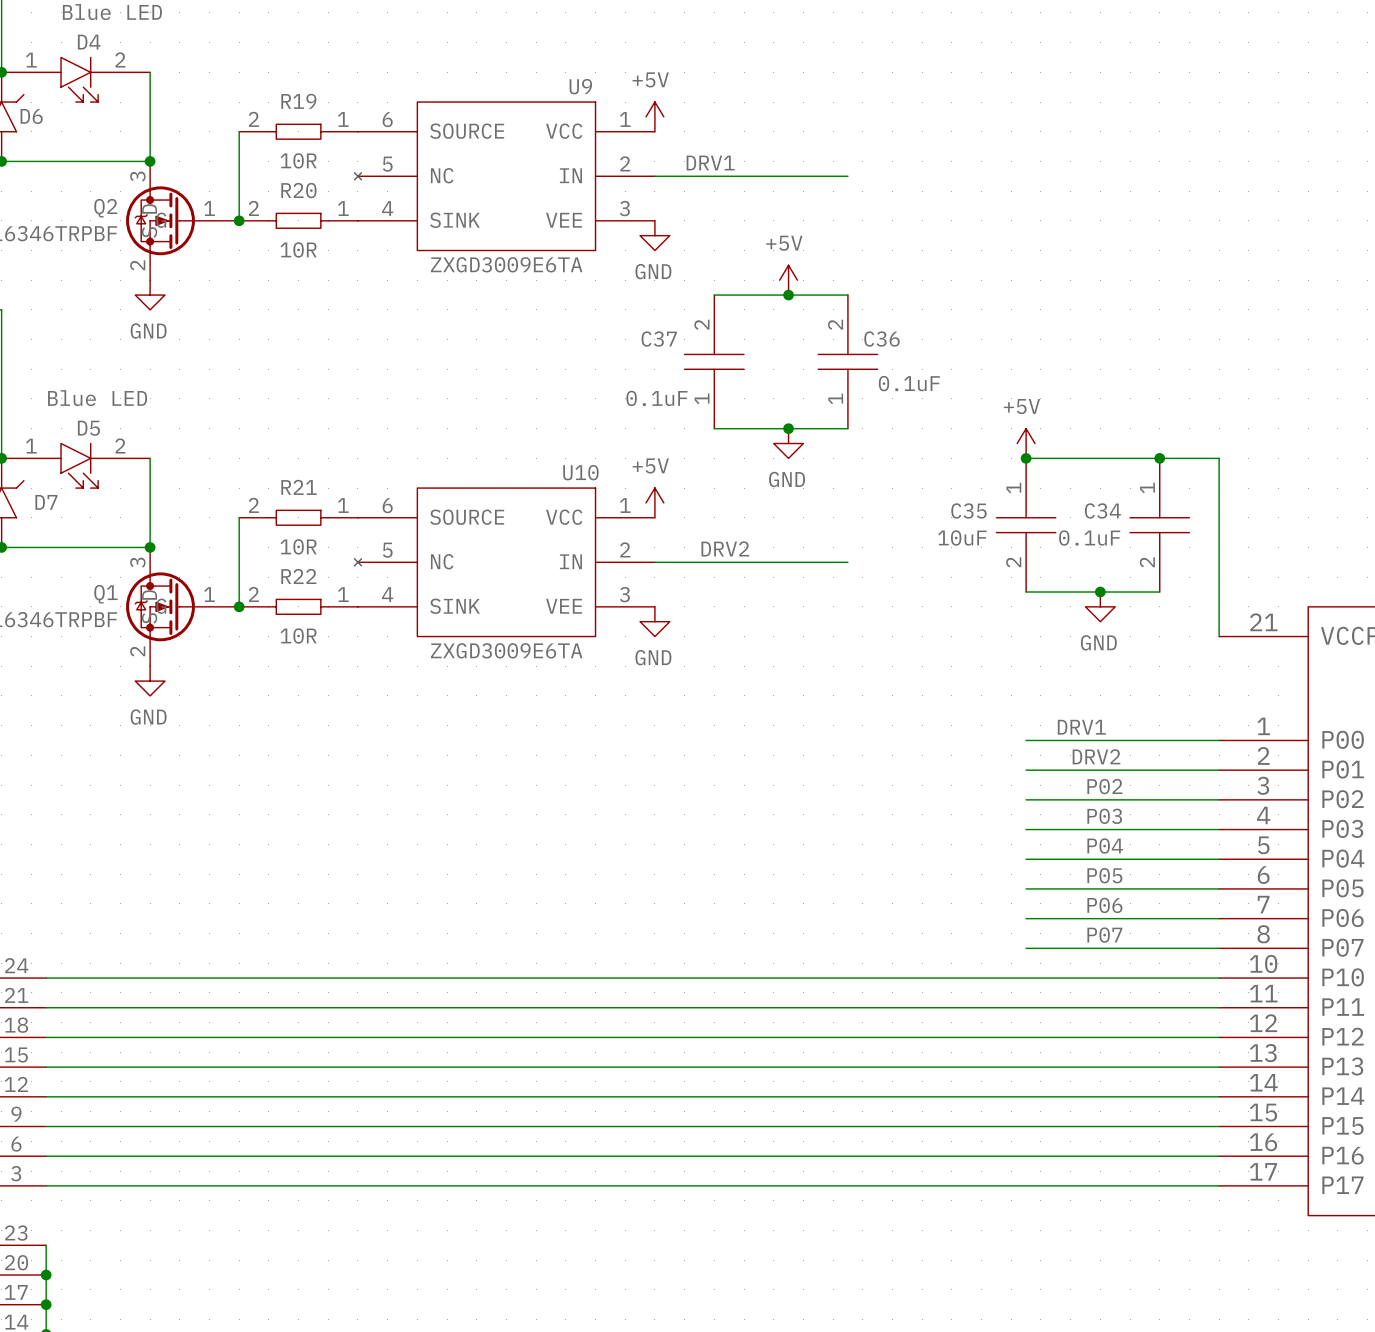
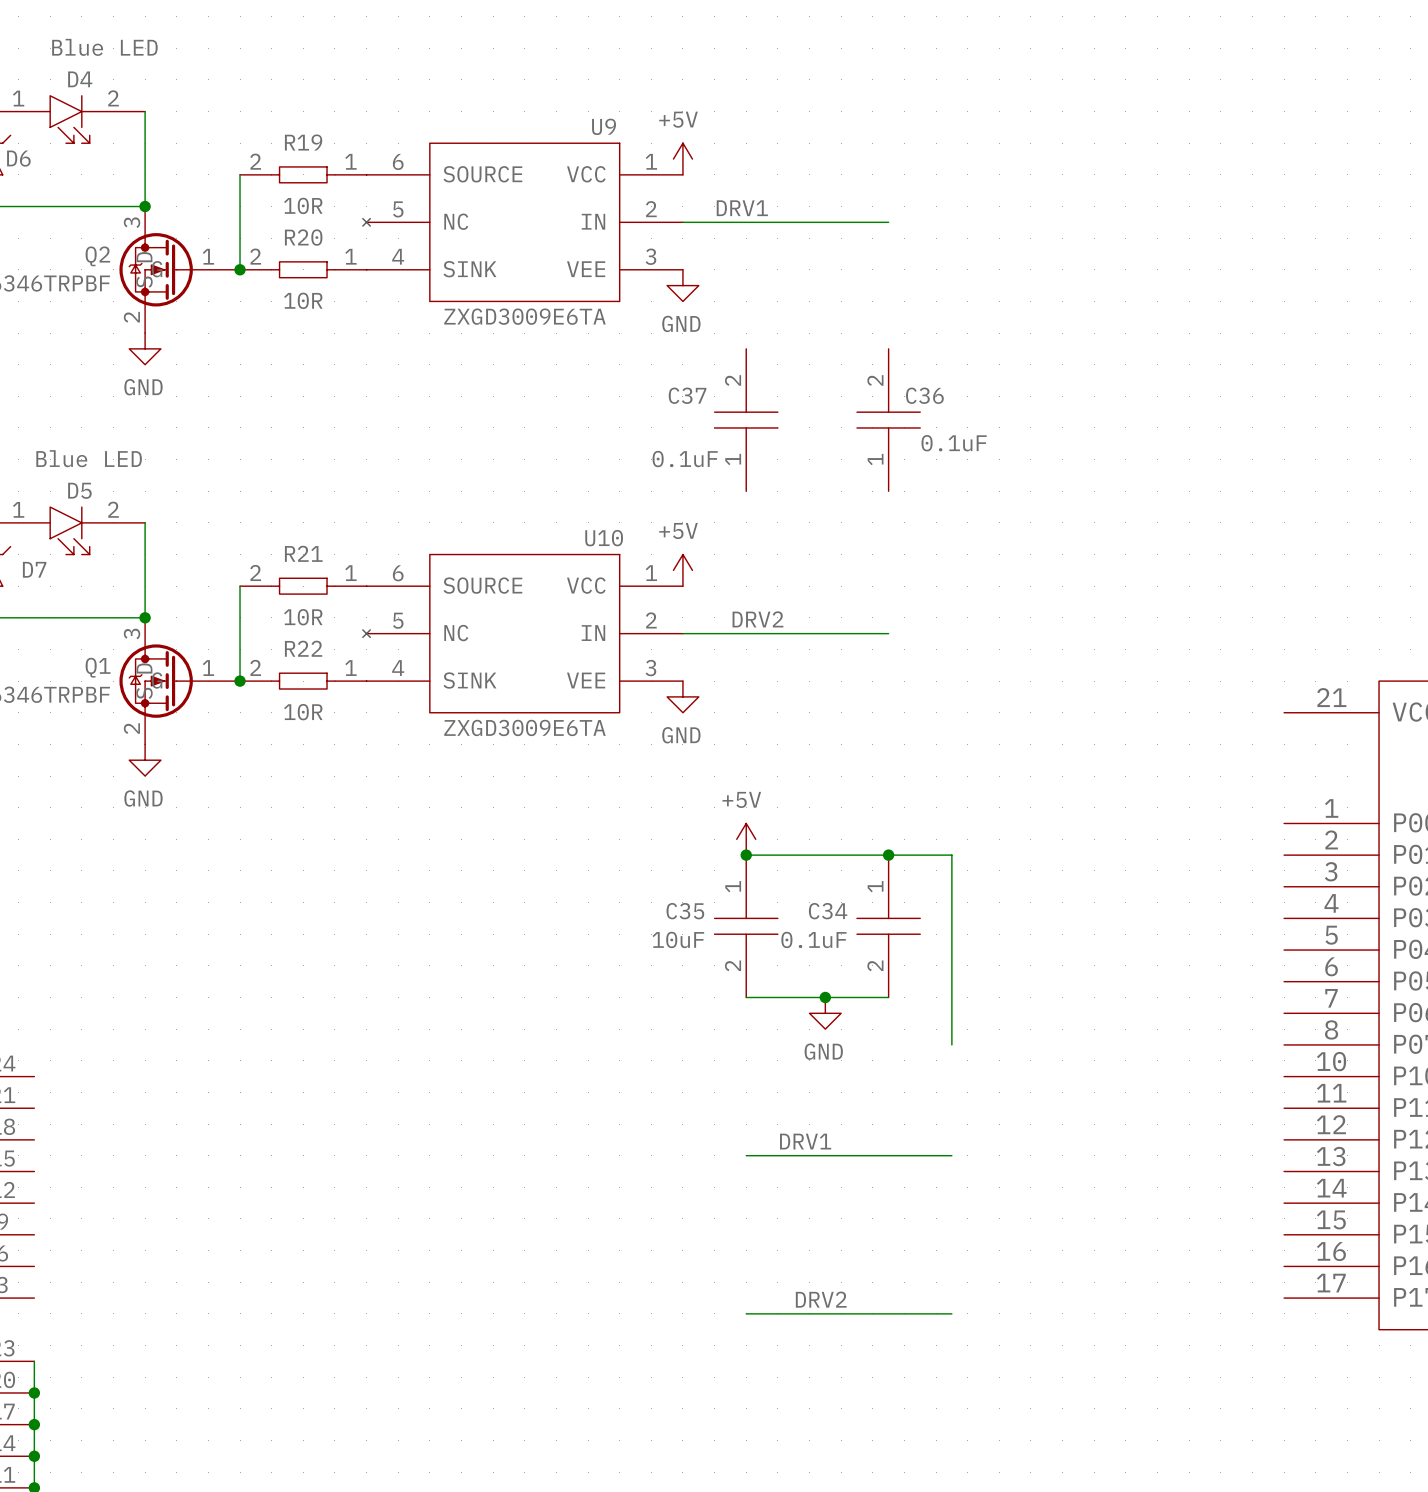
power symbol: +5V (788, 280) -> none
wire: (714, 295) (847, 295) -> none
junction: (788, 295) -> none
wire: (714, 428) (847, 428) -> none
junction: (788, 428) -> none
power symbol: GND (788, 443) -> none
power symbol: +5V (1026, 443) -> none
wire: (1026, 458) (1219, 458) (1219, 636) -> none
junction: (1026, 458) -> none
junction: (1159, 458) -> none
C35 position: (1026, 525) -> (746, 926)
C34 position: (1159, 525) -> (888, 926)
wire: (1026, 592) (1159, 592) -> none
junction: (1100, 592) -> none
power symbol: GND (1100, 606) -> none
label: DRV1 (1081, 727) -> none
wire: (1026, 740) (1219, 740) -> none
power symbol: none -> +5V (746, 839)
label: DRV2 (1096, 756) -> none
wire: none -> (746, 855) (951, 855) (951, 1044)
junction: none -> (746, 855)
junction: none -> (888, 855)
wire: (1026, 770) (1219, 770) -> none
label: P02 (1104, 786) -> none
wire: (1026, 799) (1219, 799) -> none
label: P03 (1104, 816) -> none
wire: (1026, 829) (1219, 829) -> none
label: P04 (1105, 846) -> none
wire: (1026, 859) (1219, 859) -> none
label: P05 (1104, 875) -> none
wire: (1026, 888) (1219, 888) -> none
wire: none -> (746, 997) (888, 997)
junction: none -> (825, 997)
label: P06 (1104, 905) -> none
power symbol: none -> GND (825, 1013)
wire: (1026, 918) (1219, 918) -> none
label: P07 (1104, 935) -> none
wire: (1026, 948) (1219, 948) -> none
wire: (46, 978) (1219, 978) -> none
wire: (46, 1007) (1219, 1007) -> none
wire: (46, 1037) (1219, 1037) -> none
label: none -> DRV1 (805, 1141)
wire: none -> (746, 1155) (951, 1155)
wire: (46, 1067) (1219, 1067) -> none
wire: (46, 1096) (1219, 1096) -> none
wire: (46, 1126) (1219, 1126) -> none
wire: (46, 1156) (1219, 1156) -> none
wire: (46, 1185) (1219, 1185) -> none
label: none -> DRV2 (821, 1299)
wire: none -> (746, 1313) (951, 1313)

